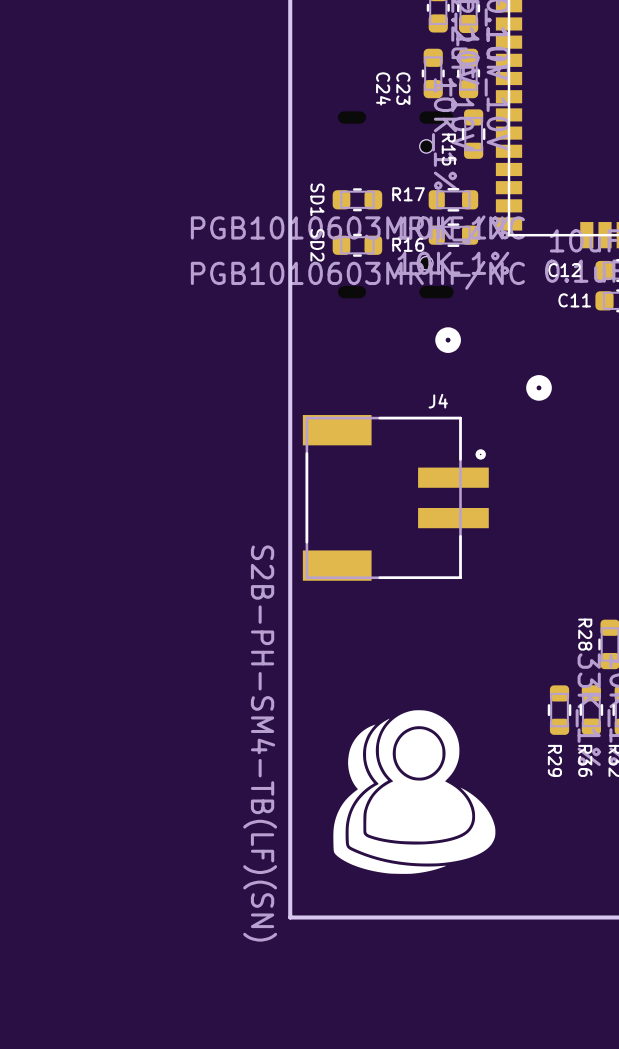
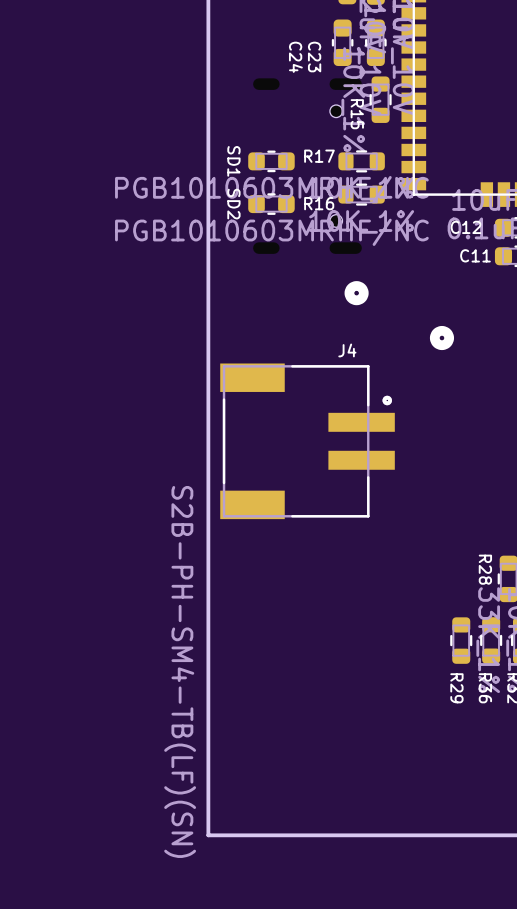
drawing: [333, 710, 496, 874] -> none

